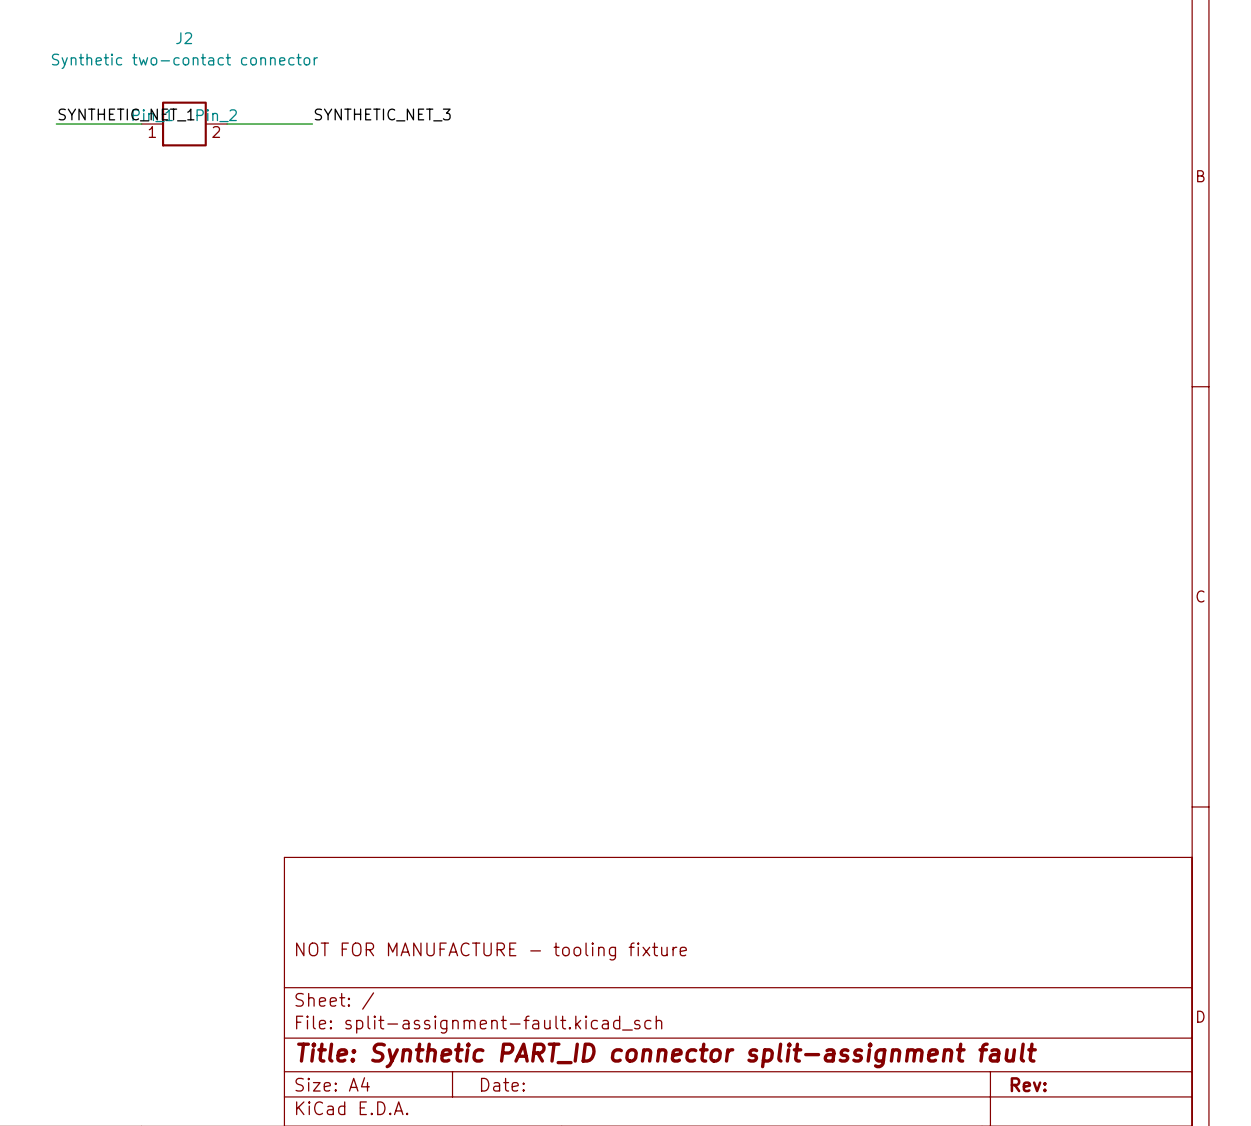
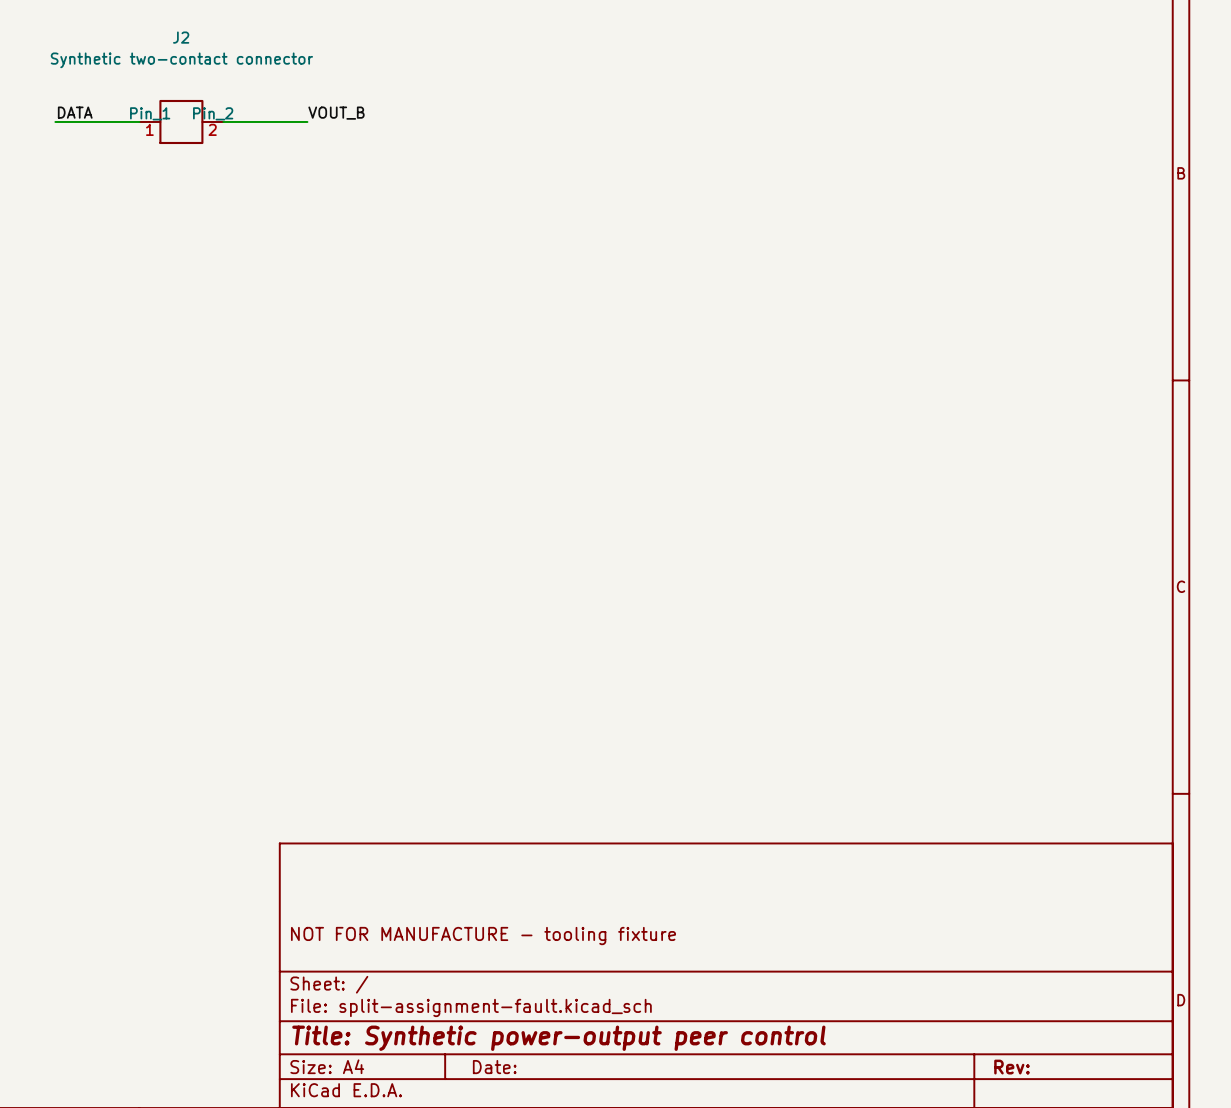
label: SYNTHETIC_NET_1 (126, 114) -> DATA (75, 112)
label: SYNTHETIC_NET_3 (382, 114) -> VOUT_B (336, 113)
title block: Title: Synthetic PART_ID connector split-assignment fault (667, 1055) -> Title: Synthetic power-output peer control (559, 1038)

